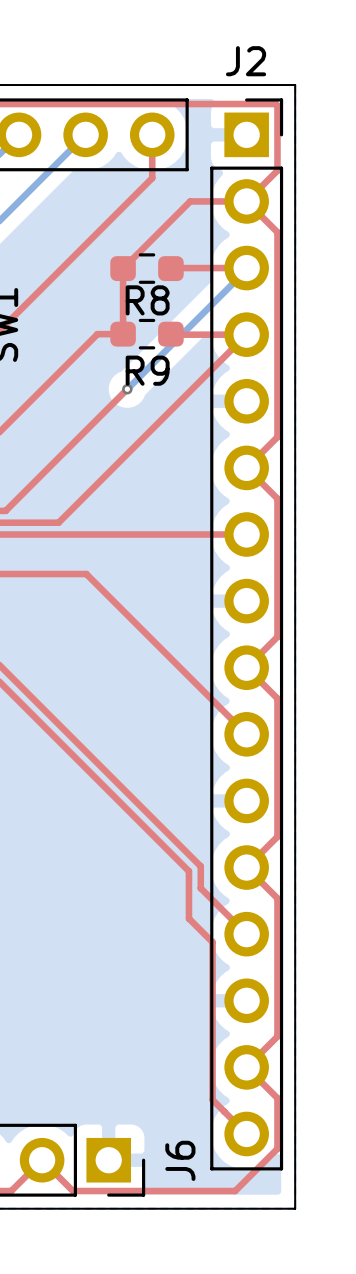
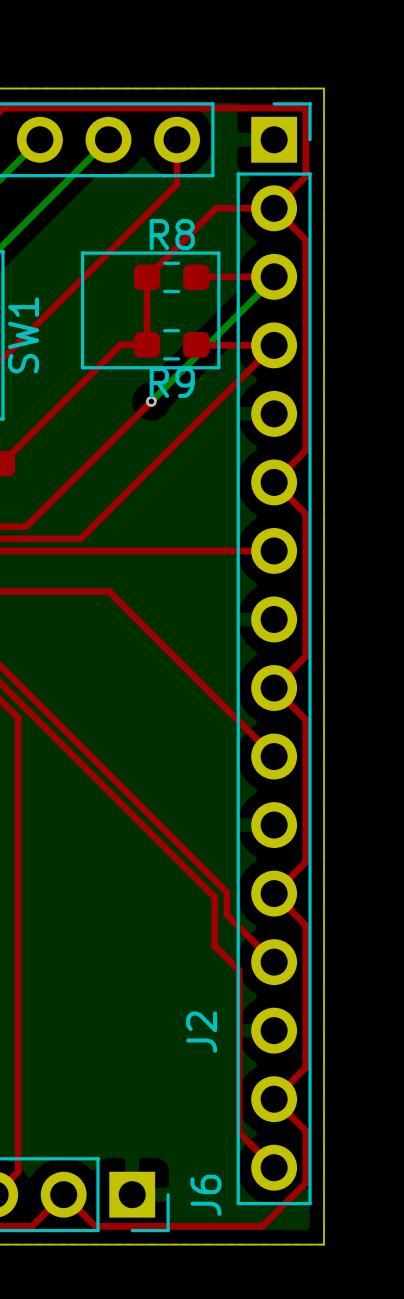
J2 name rotation: 0° (246, 61) -> 90° counterclockwise (201, 1032)
J2 name position: J2 (246, 61) -> J2 (201, 1032)
line: none -> (82, 253) (82, 367) (218, 367) (218, 253) (82, 253)
R8 name position: R8 (147, 300) -> R8 (172, 234)

